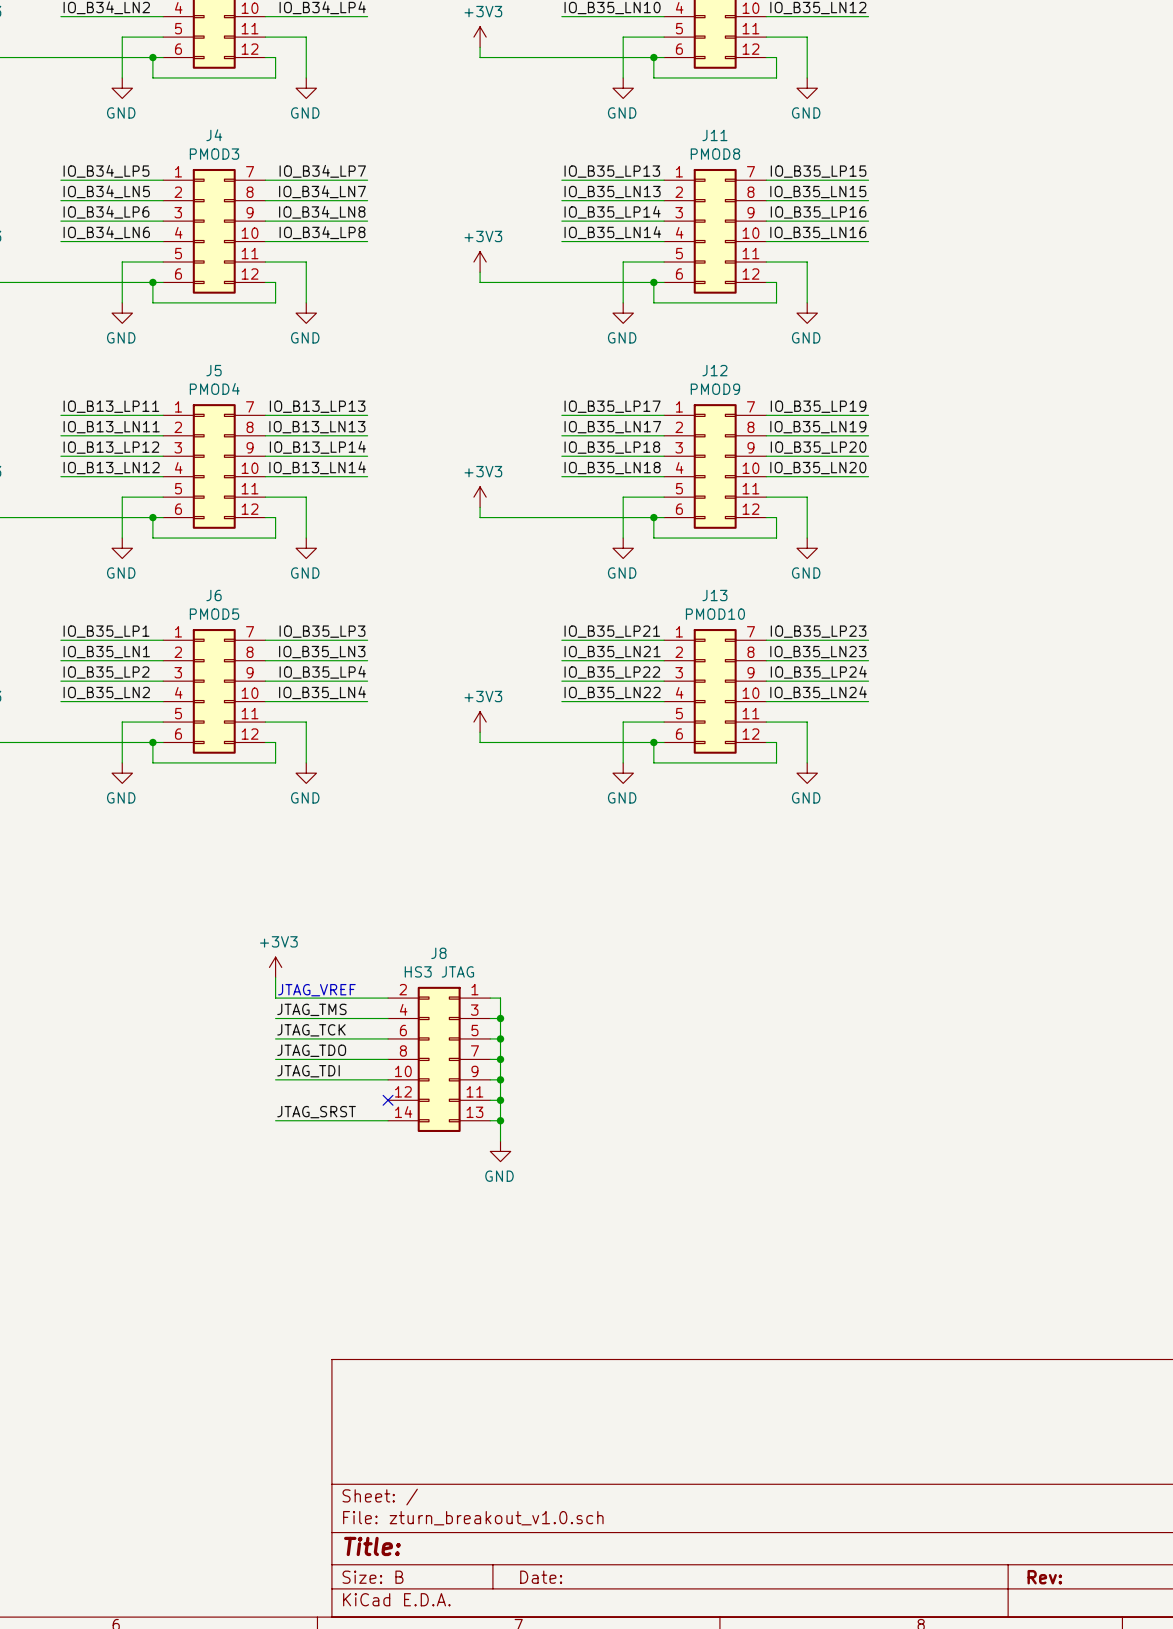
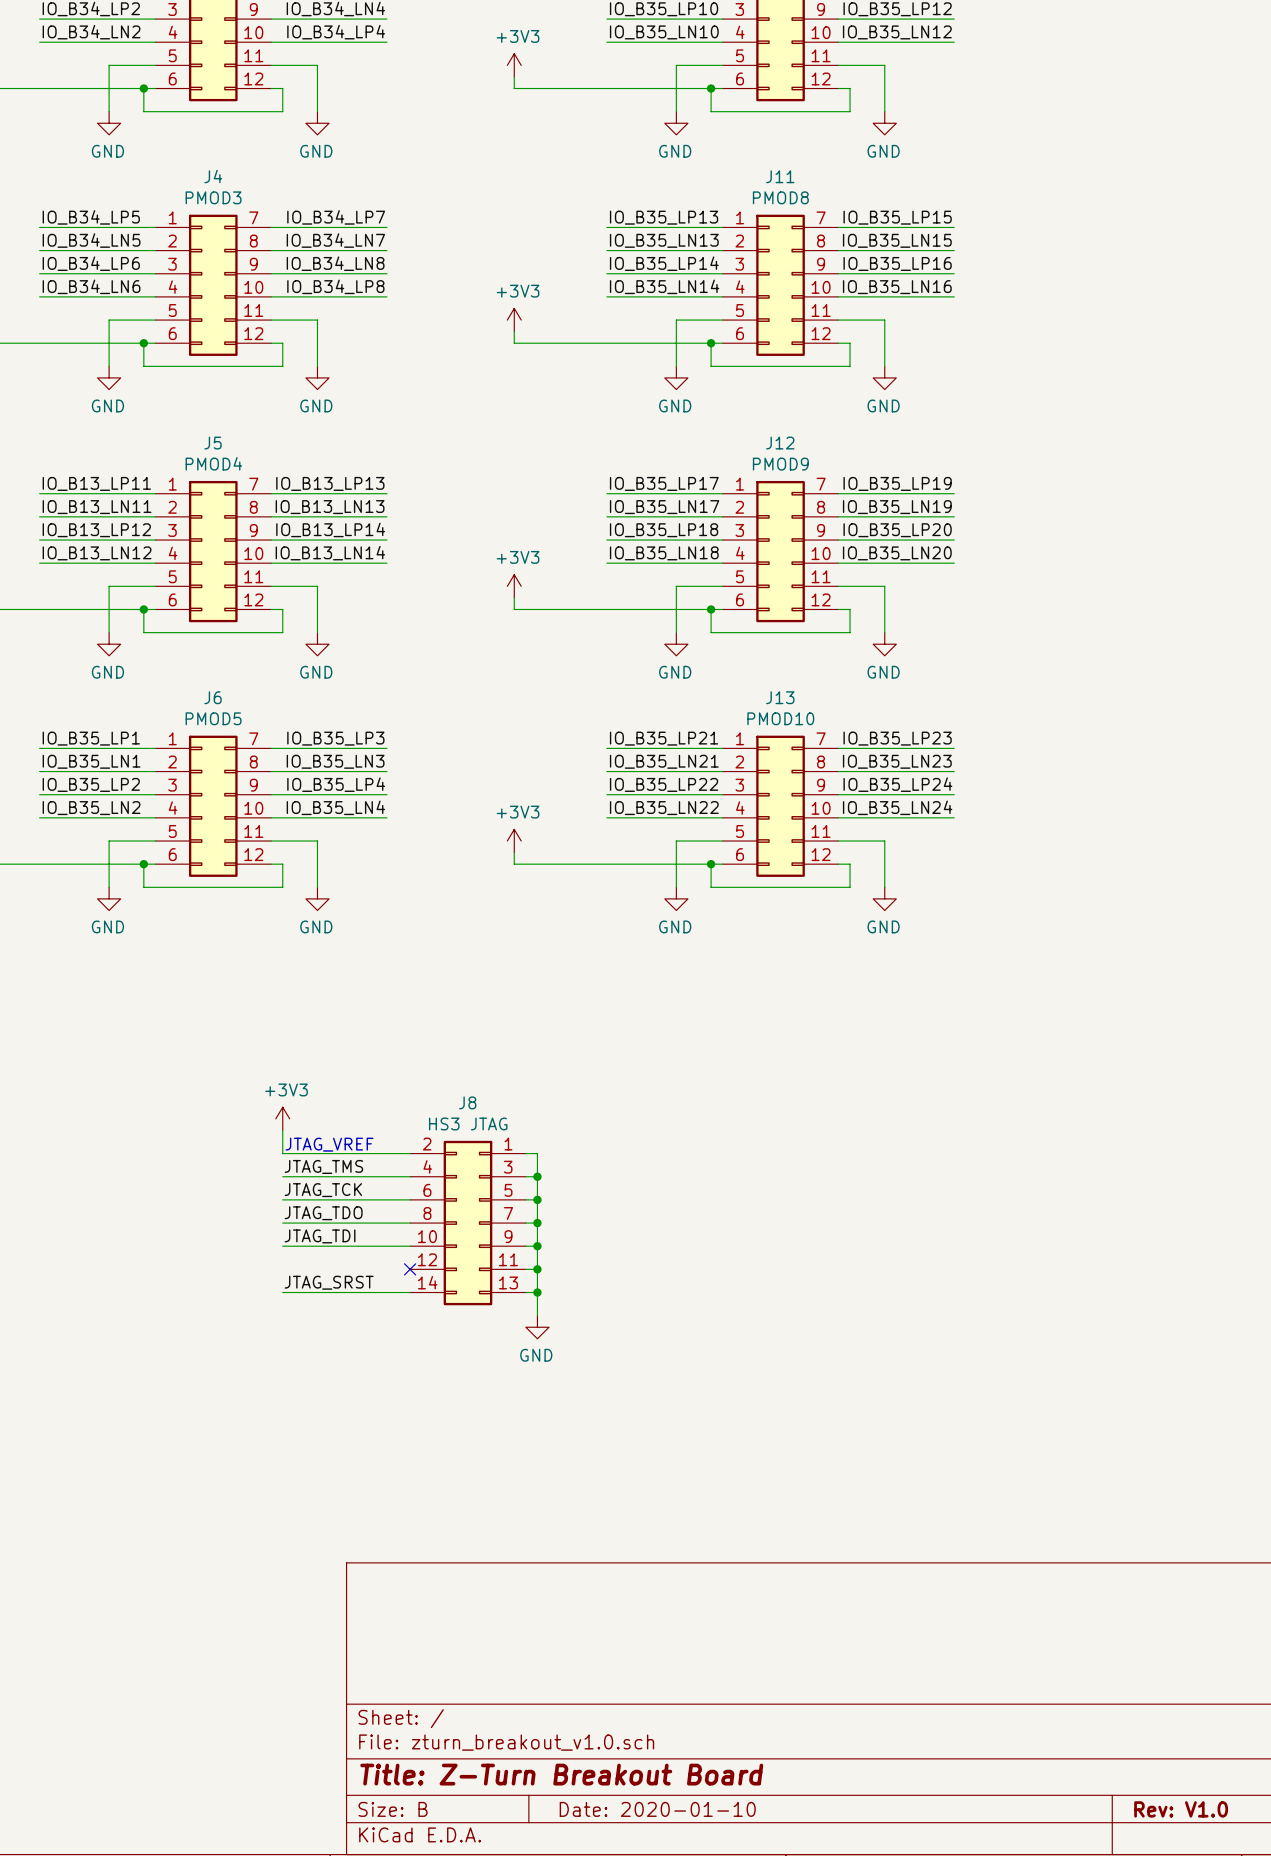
title block: Title: (372, 1546) -> Title: Z-Turn Breakout Board (561, 1774)
title block: Date: (541, 1577) -> Date: 2020-01-10 (657, 1809)
title block: Rev: (1044, 1577) -> Rev: V1.0 (1181, 1809)

